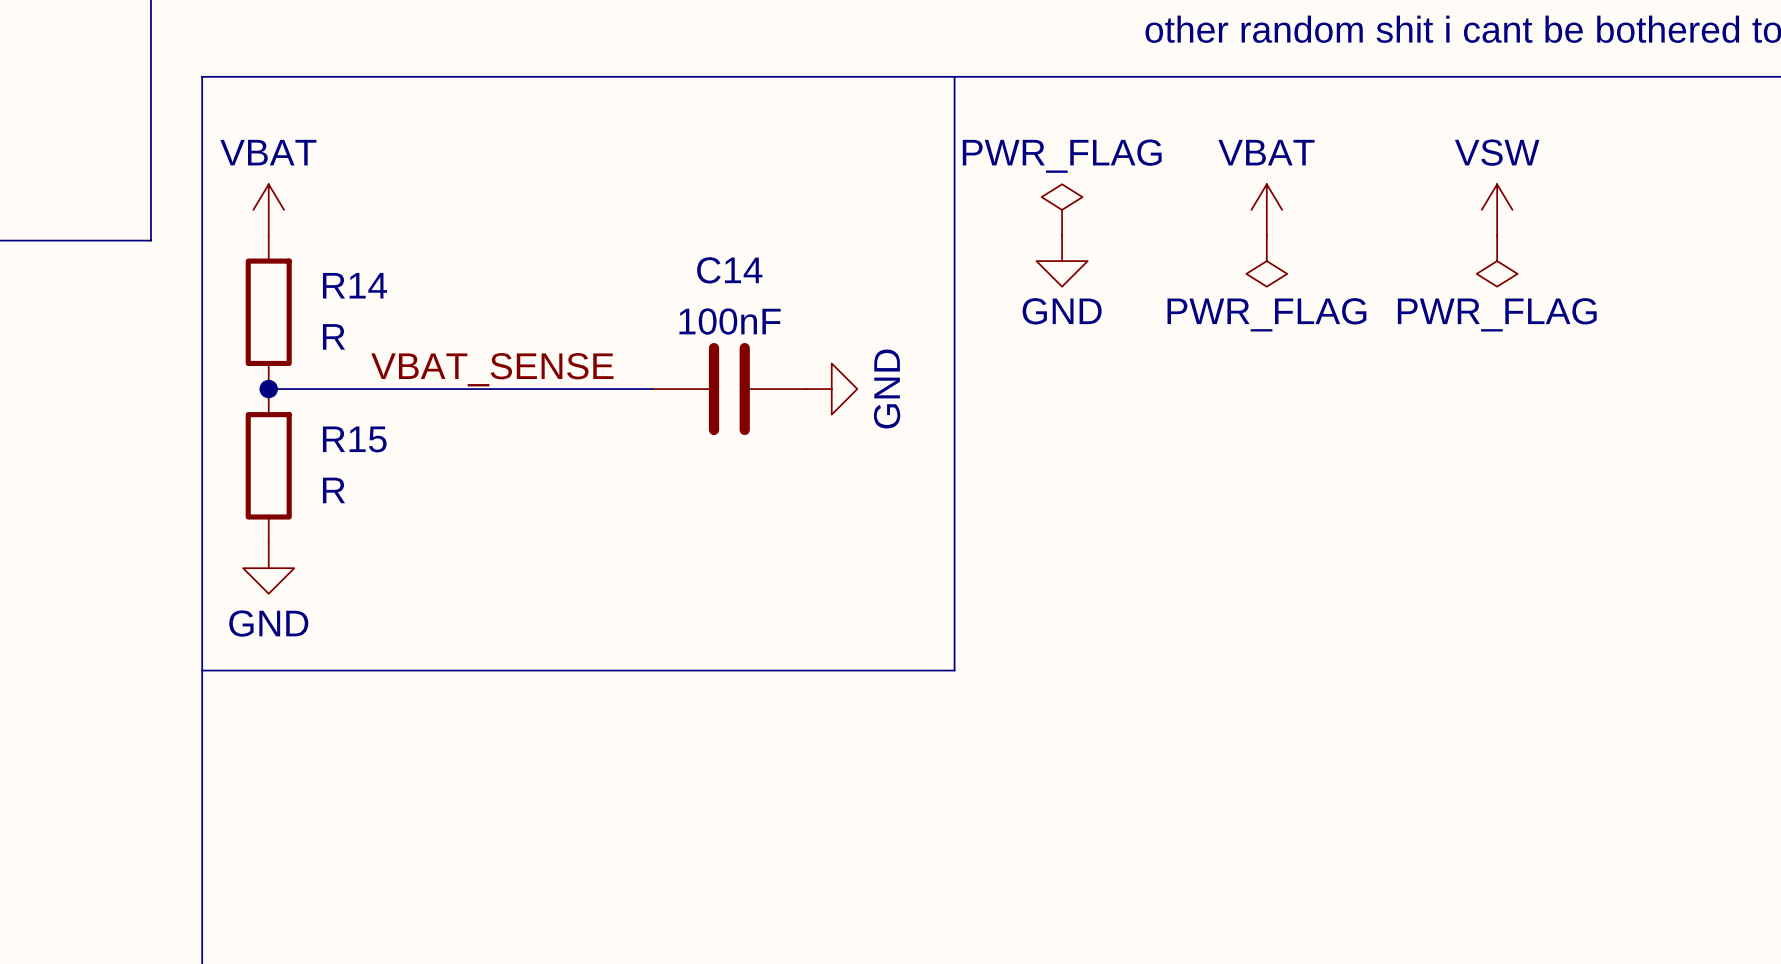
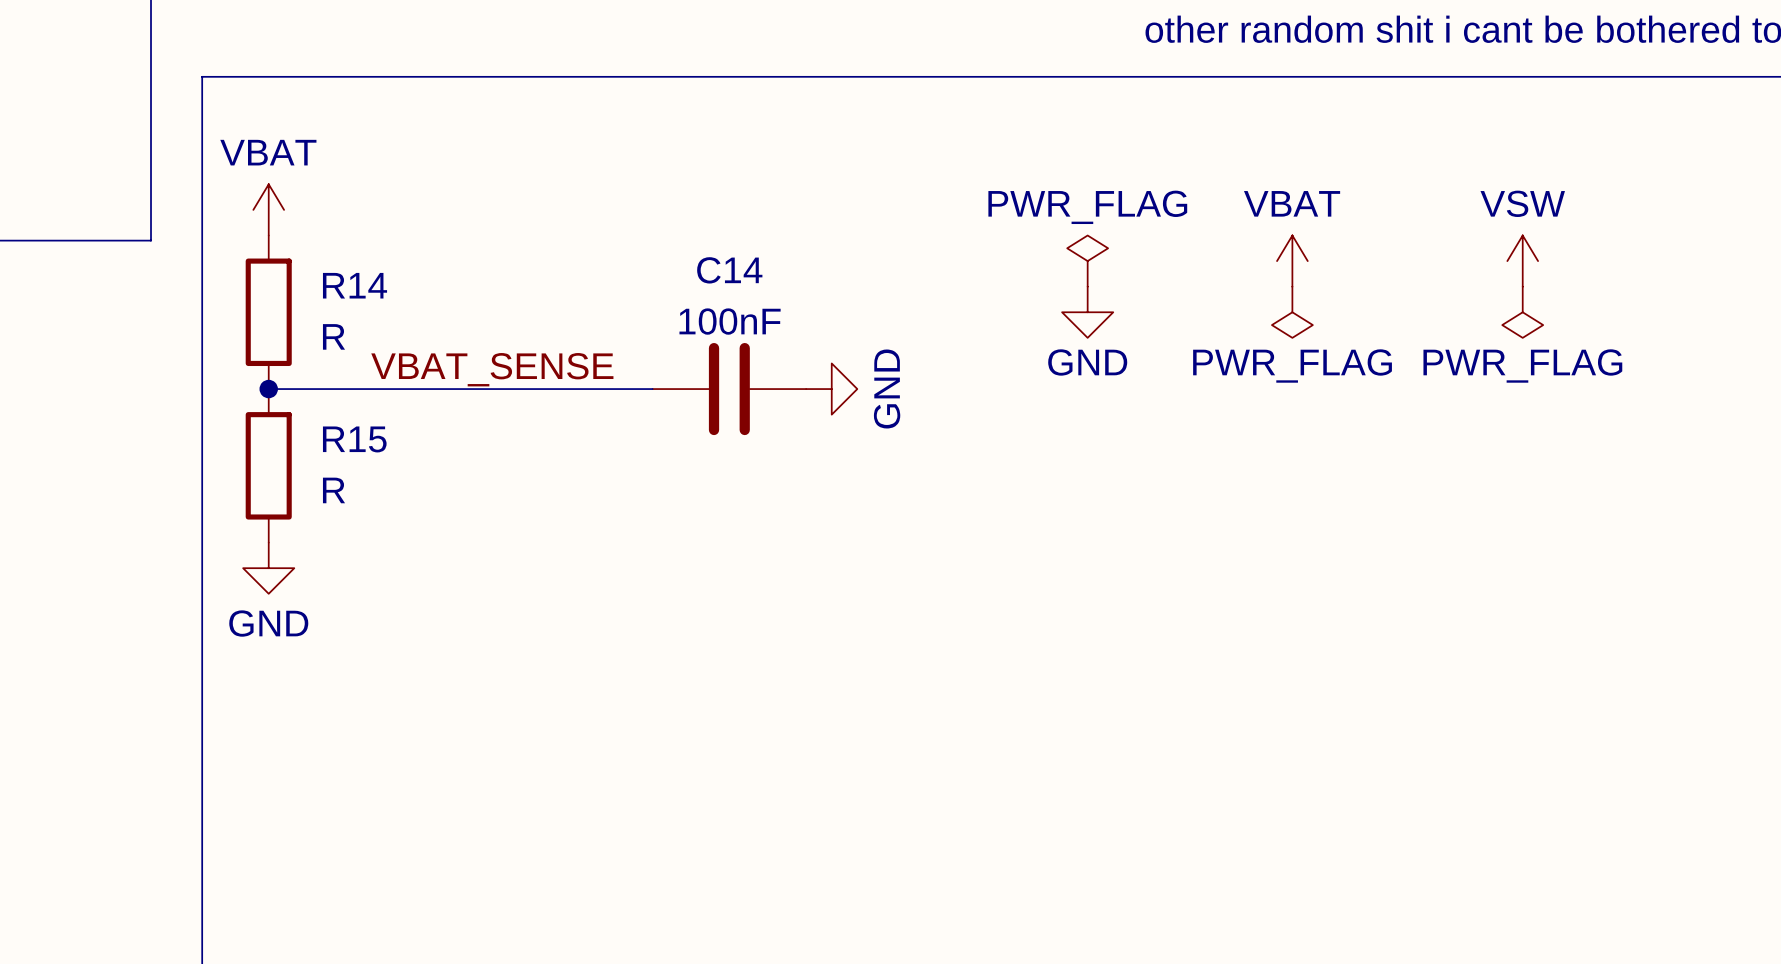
line: (954, 76) (954, 670) (202, 670) -> none
power symbol position: PWR_FLAG (1062, 209) -> PWR_FLAG (1087, 261)
power symbol position: VBAT (1266, 209) -> VBAT (1292, 261)
power symbol position: VSW (1497, 209) -> VSW (1522, 261)
power symbol position: GND (1062, 261) -> GND (1087, 312)
power symbol position: PWR_FLAG (1266, 261) -> PWR_FLAG (1292, 312)
power symbol position: PWR_FLAG (1497, 261) -> PWR_FLAG (1522, 312)

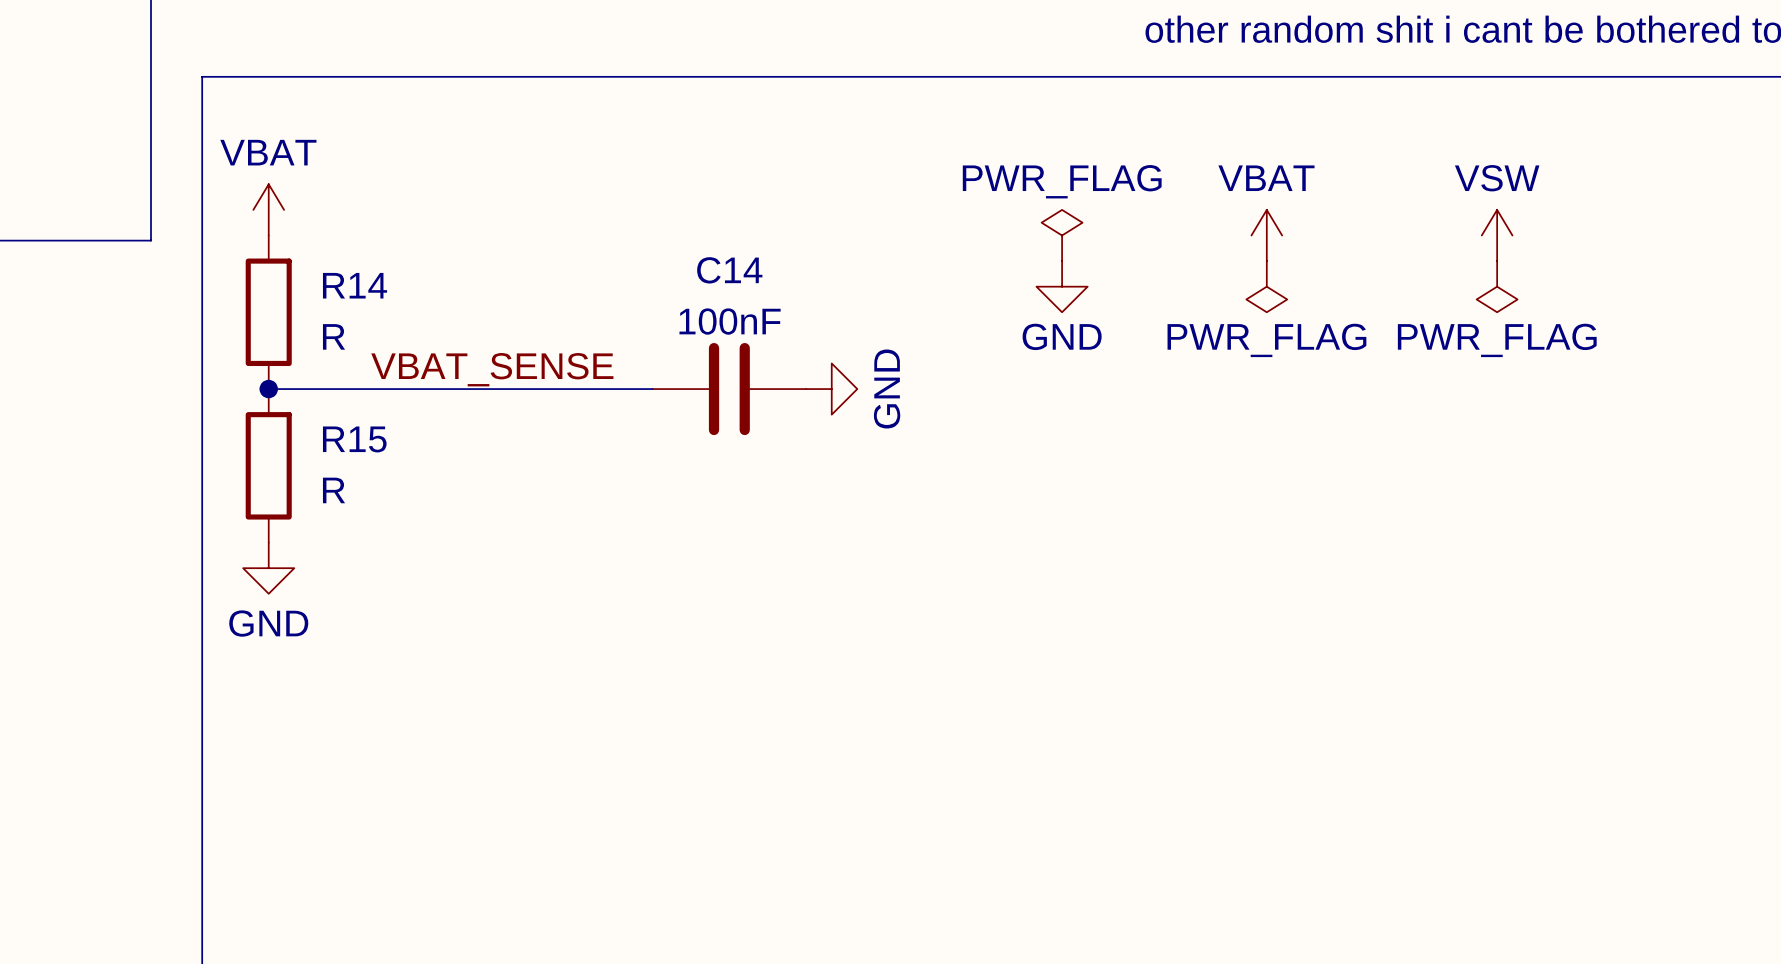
power symbol position: PWR_FLAG (1087, 261) -> PWR_FLAG (1062, 235)
power symbol position: VBAT (1292, 261) -> VBAT (1266, 235)
power symbol position: VSW (1522, 261) -> VSW (1497, 235)
power symbol position: GND (1087, 312) -> GND (1062, 286)
power symbol position: PWR_FLAG (1292, 312) -> PWR_FLAG (1266, 286)
power symbol position: PWR_FLAG (1522, 312) -> PWR_FLAG (1497, 286)

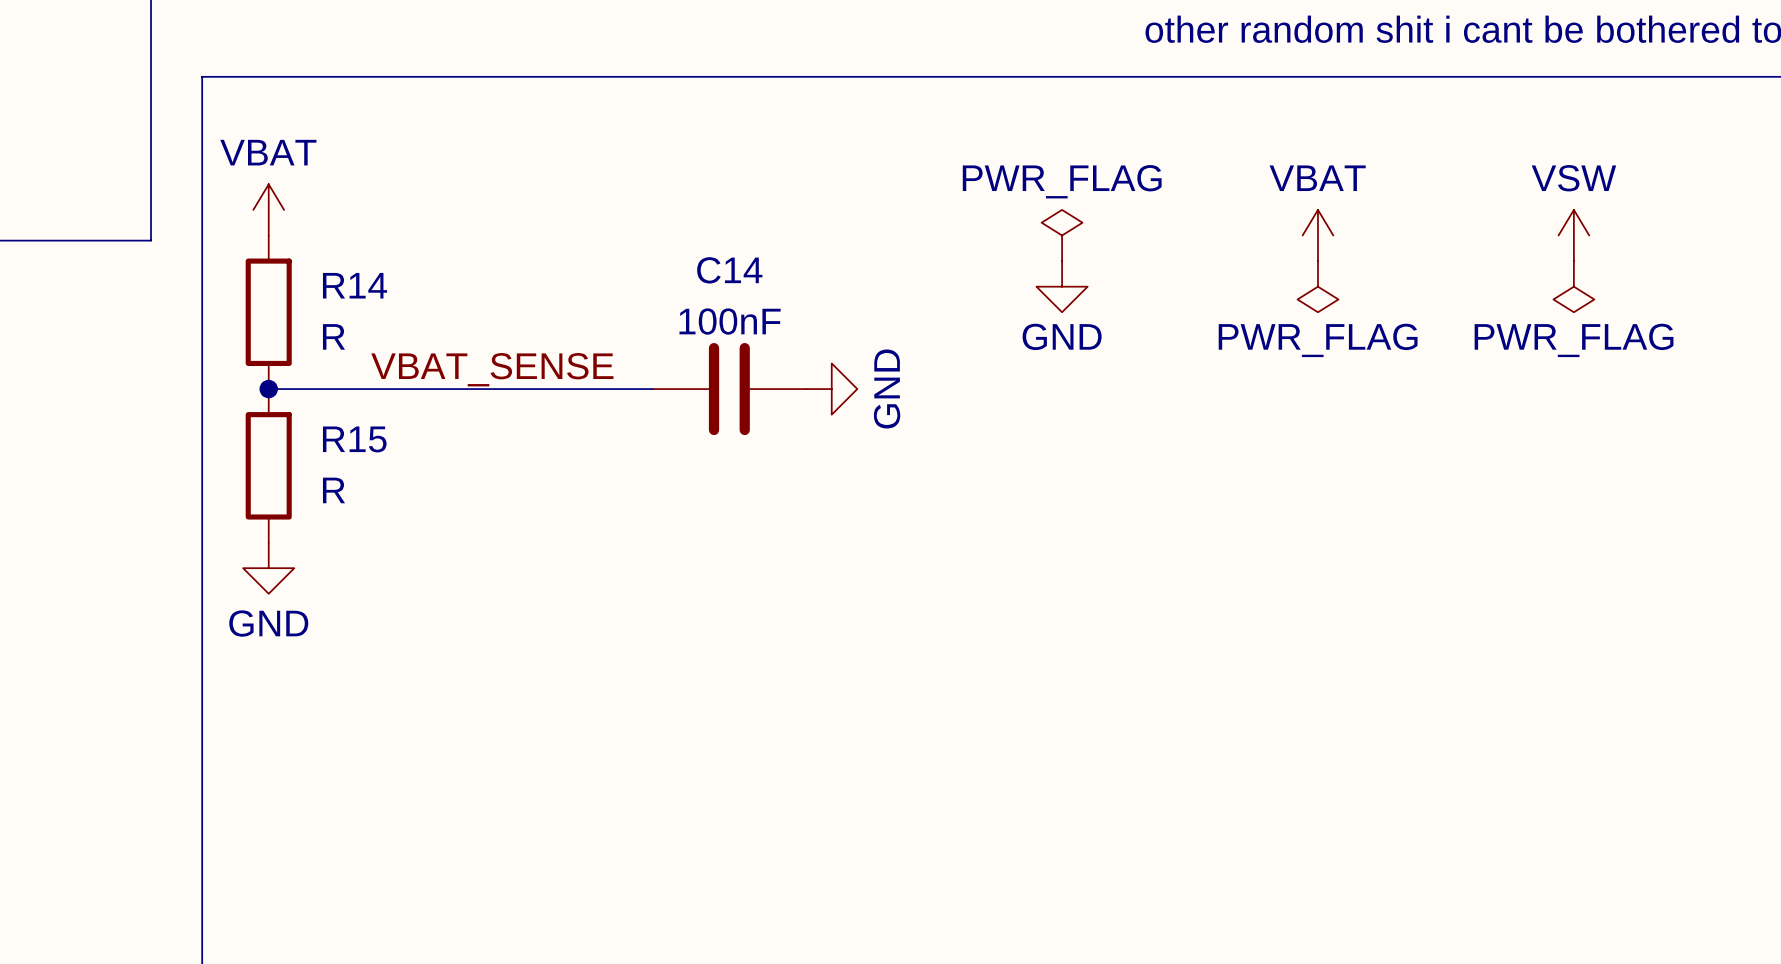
power symbol position: VBAT (1266, 235) -> VBAT (1317, 235)
power symbol position: VSW (1497, 235) -> VSW (1573, 235)
power symbol position: PWR_FLAG (1266, 286) -> PWR_FLAG (1317, 286)
power symbol position: PWR_FLAG (1497, 286) -> PWR_FLAG (1573, 286)

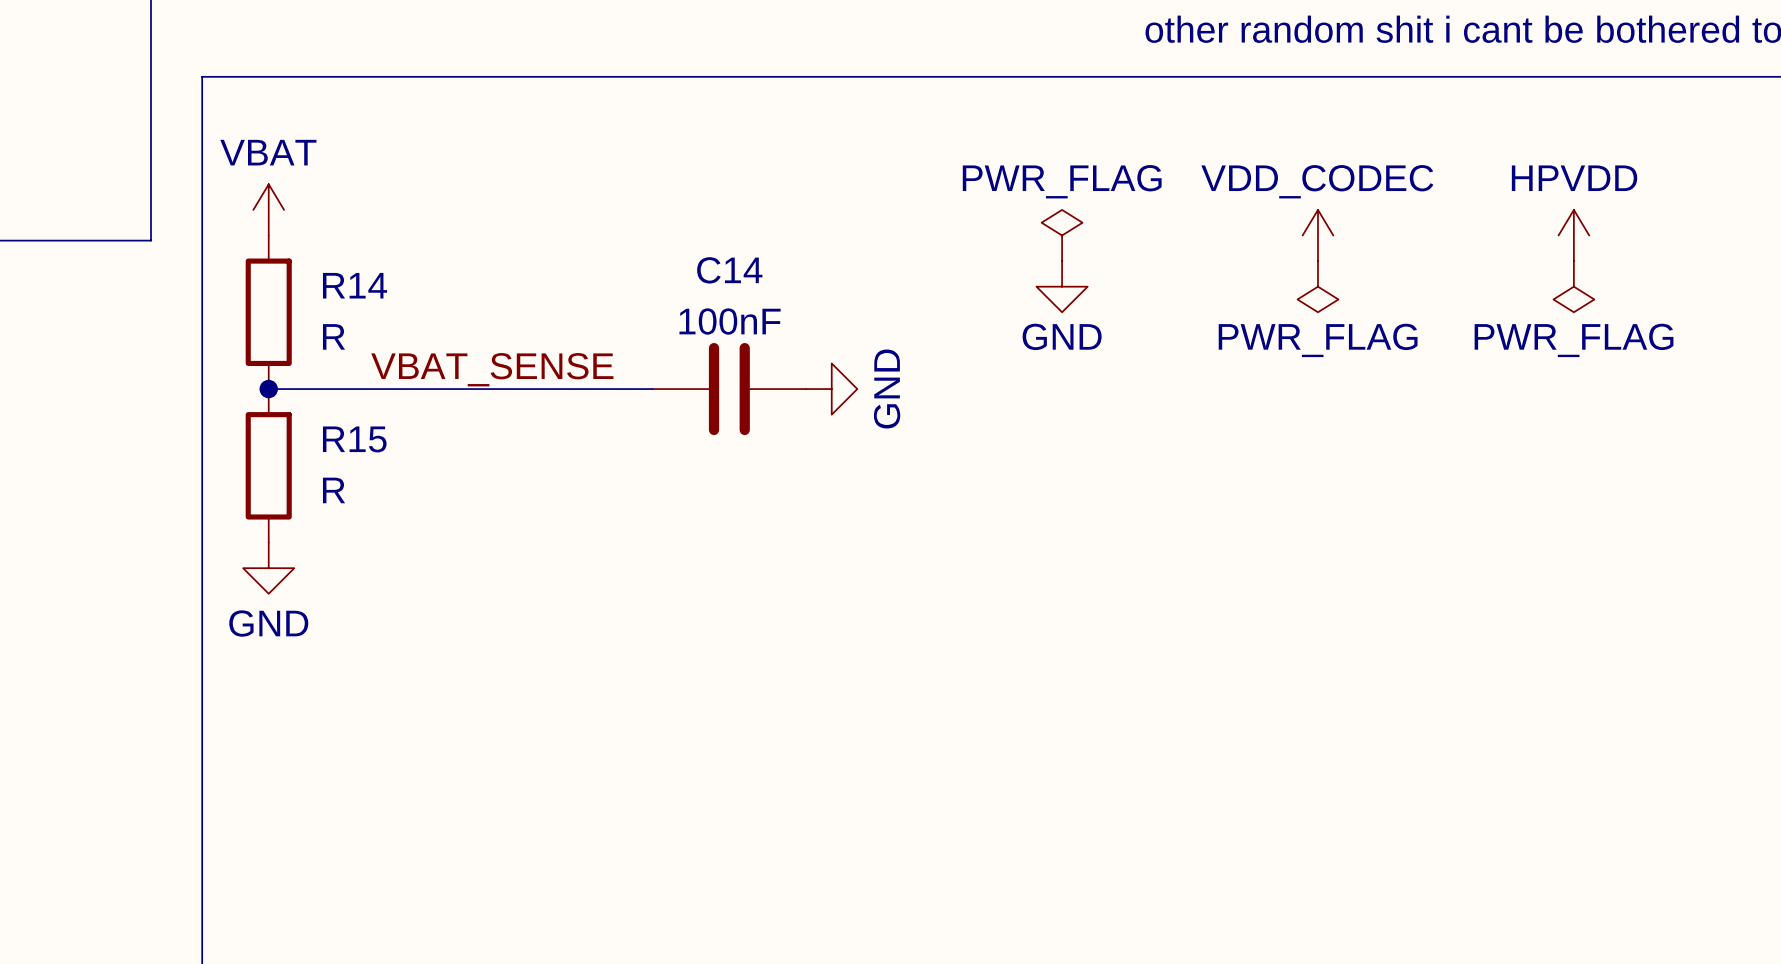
power symbol: VBAT (1317, 235) -> VDD_CODEC (1317, 235)
power symbol: VSW (1573, 235) -> HPVDD (1573, 235)

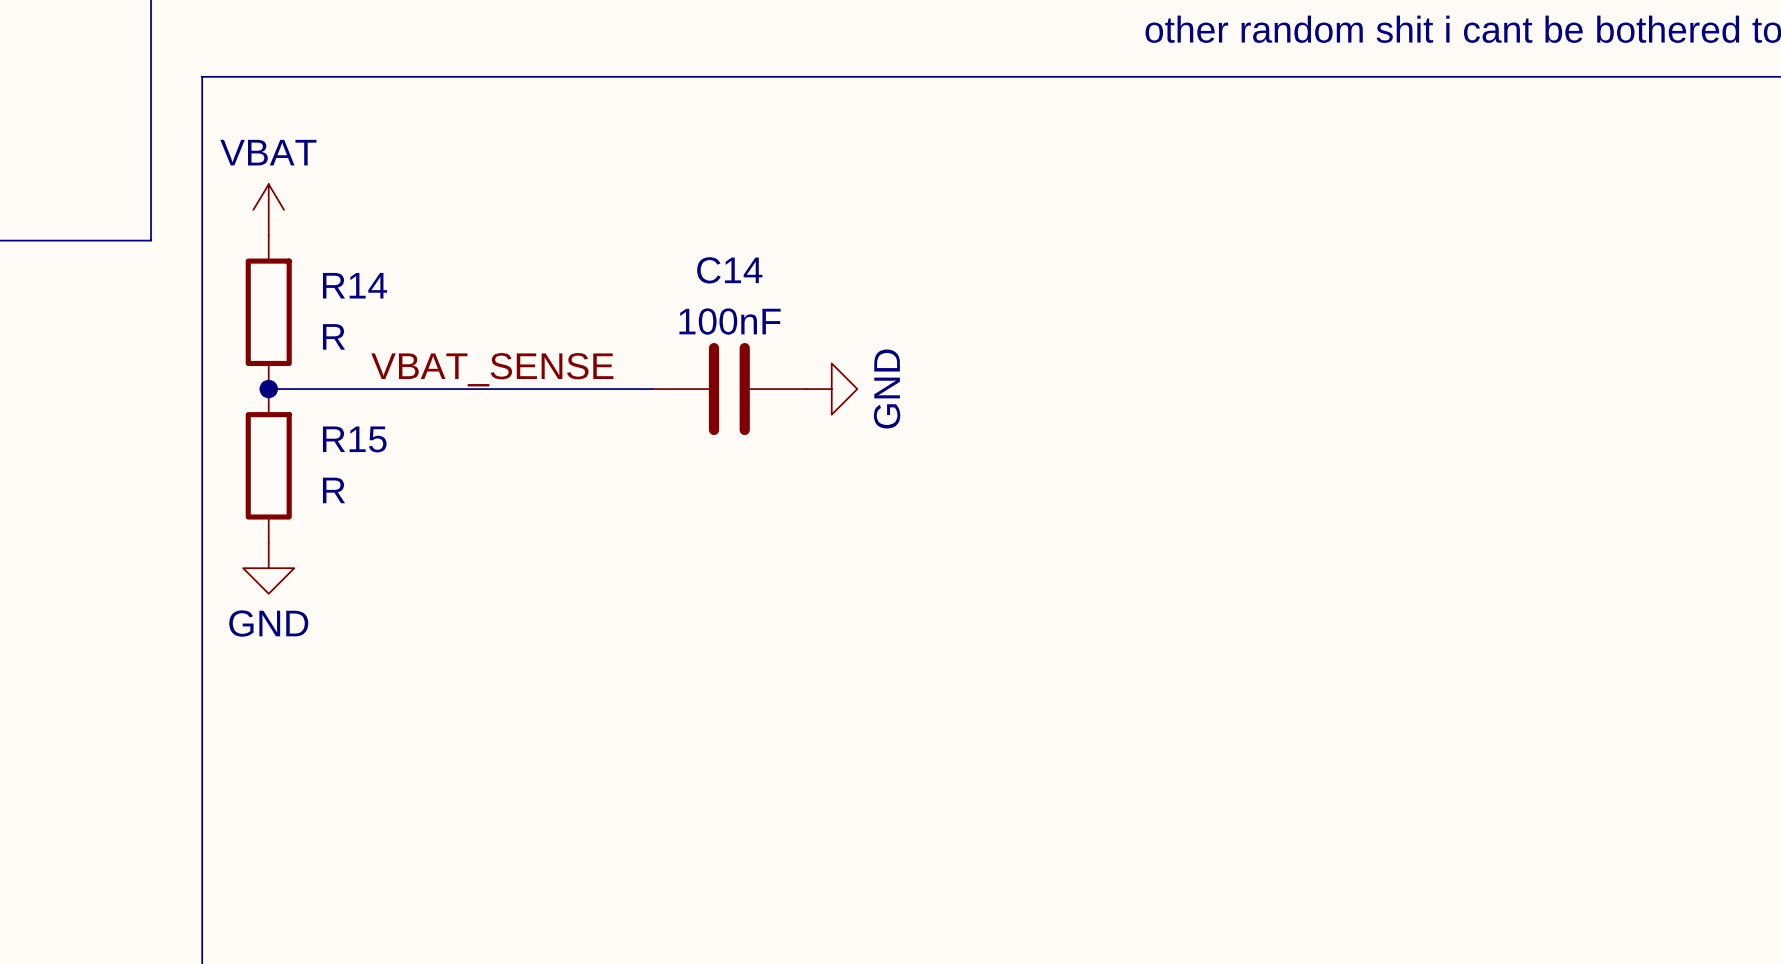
power symbol: PWR_FLAG (1062, 235) -> none
power symbol: VDD_CODEC (1317, 235) -> none
power symbol: HPVDD (1573, 235) -> none
power symbol: GND (1062, 286) -> none
power symbol: PWR_FLAG (1317, 286) -> none
power symbol: PWR_FLAG (1573, 286) -> none

